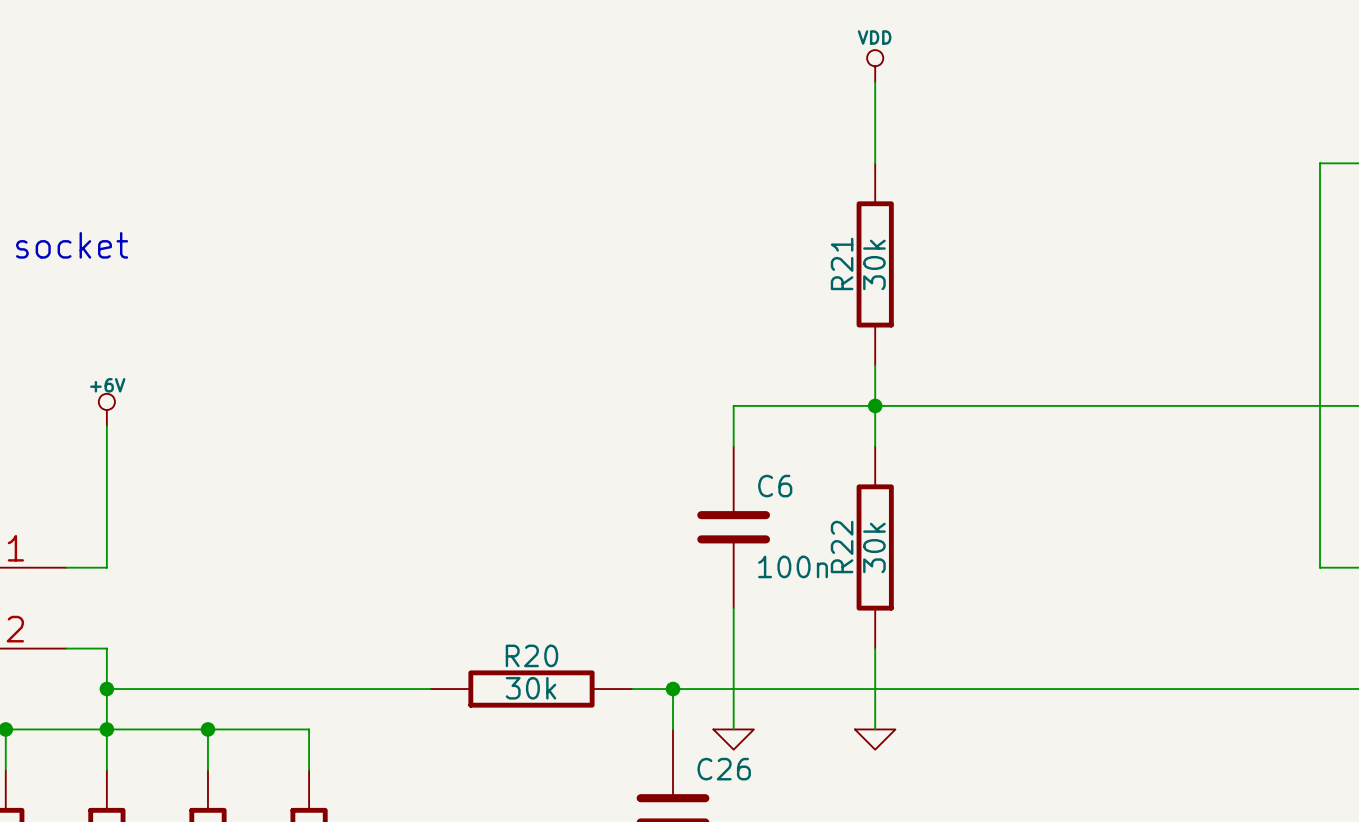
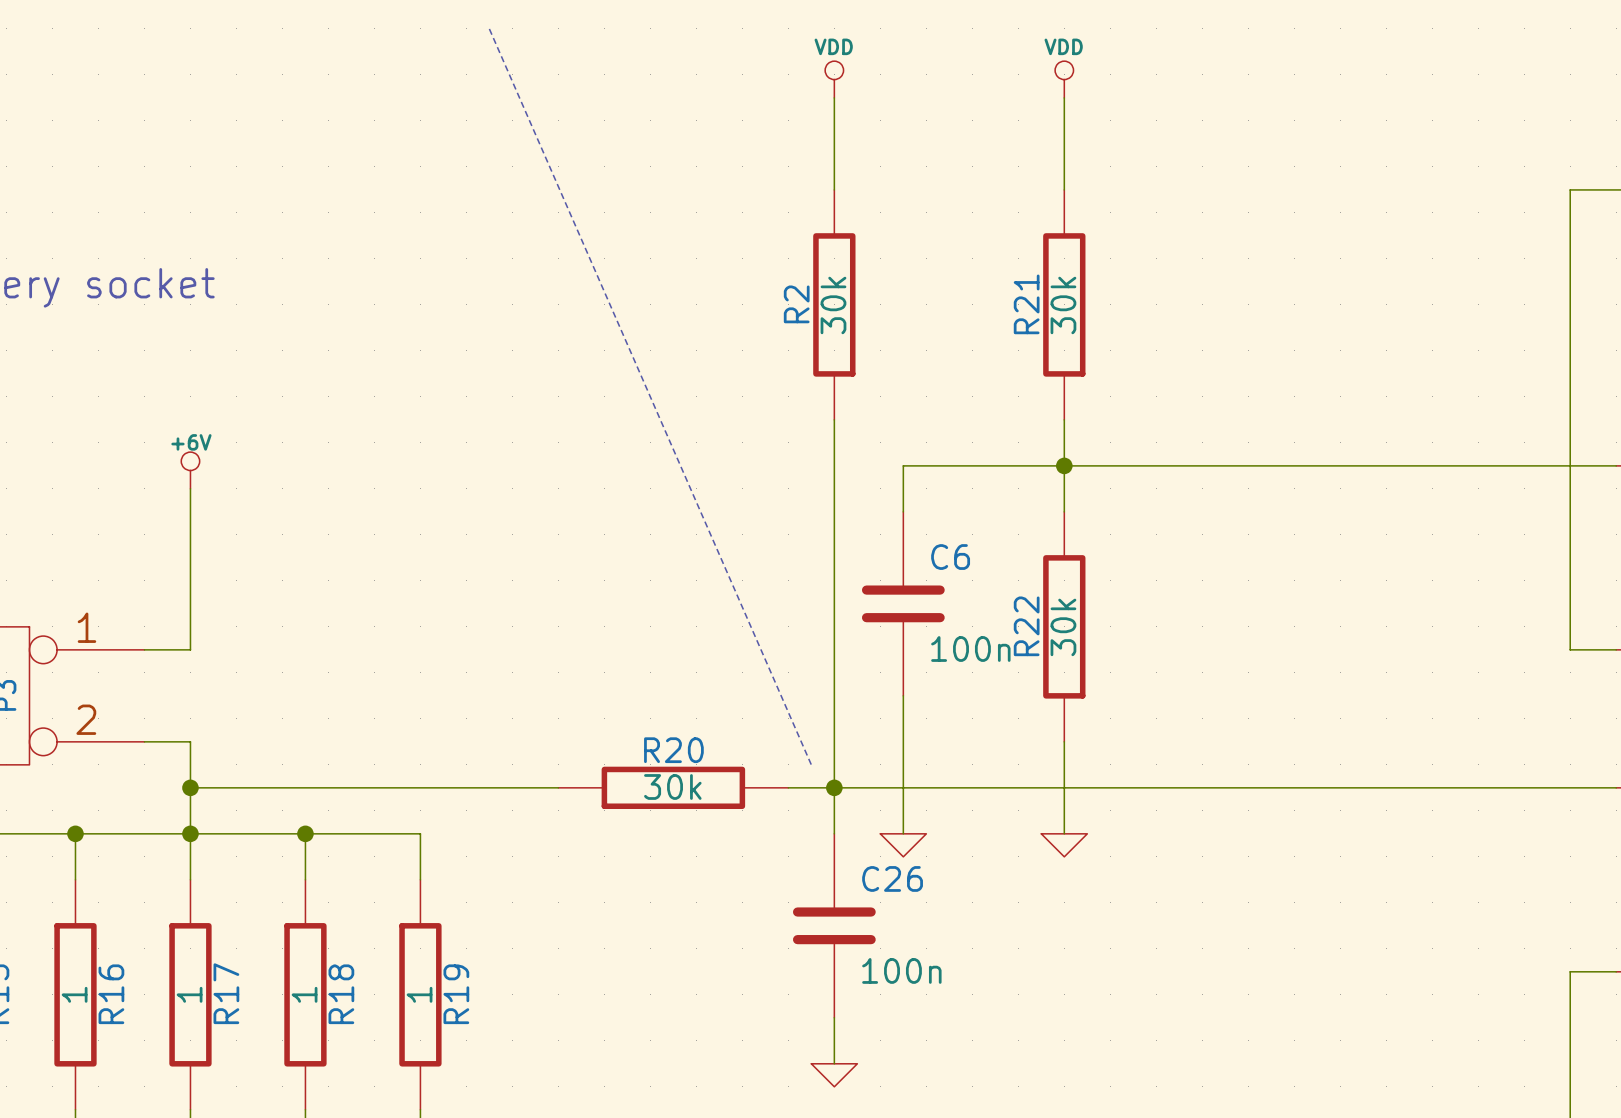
line: none -> (489, 28) (811, 764)
power symbol: none -> VDD (834, 79)
wire: none -> (834, 97) (834, 189)
R2: none -> 30k (834, 304)
wire: none -> (834, 419) (834, 787)

